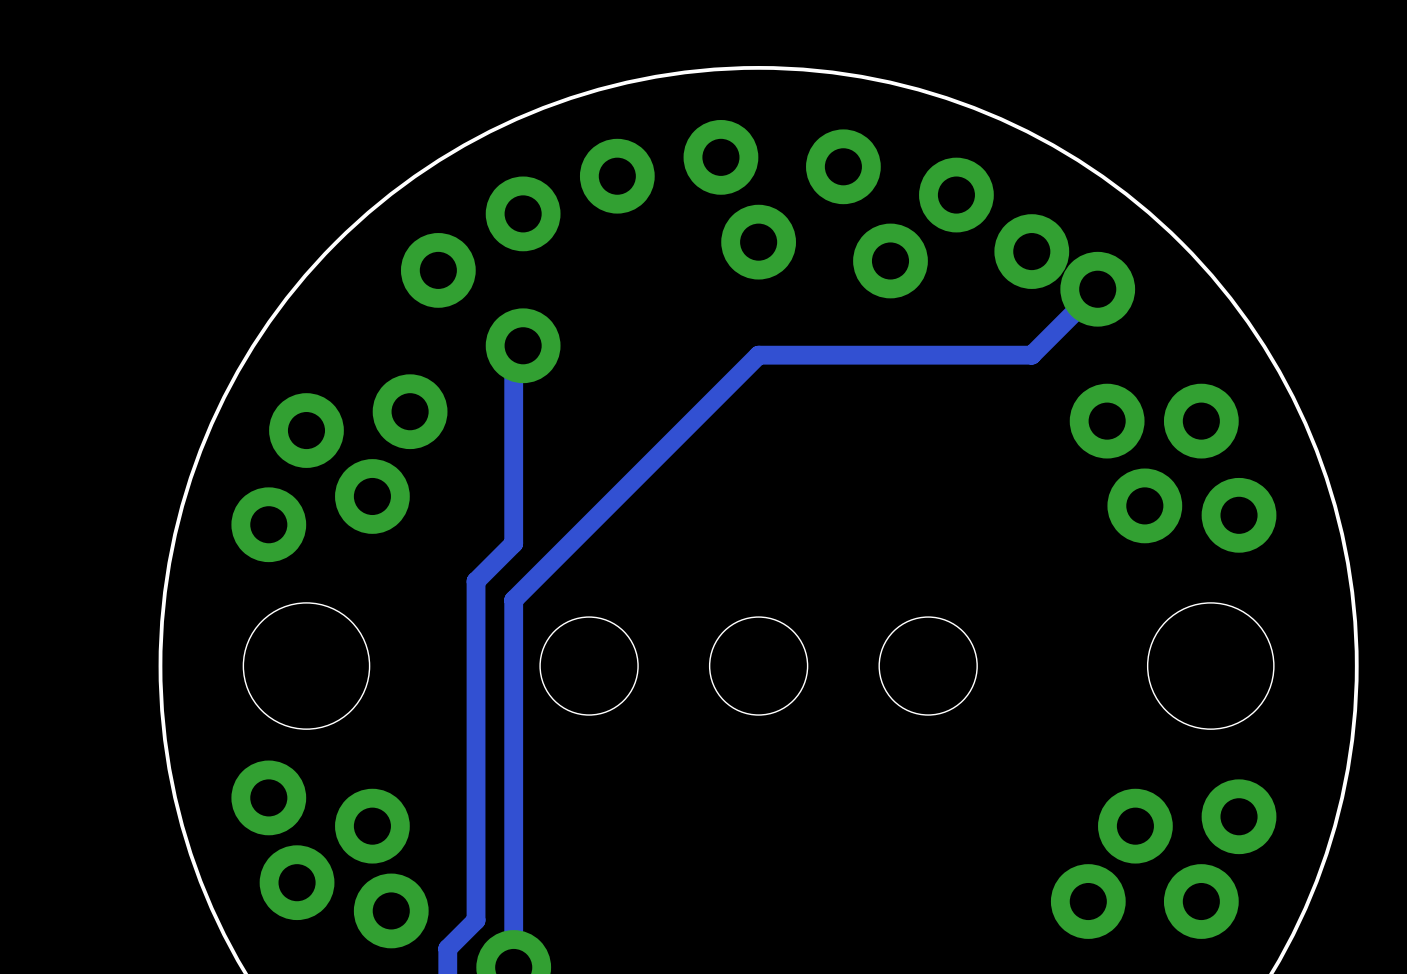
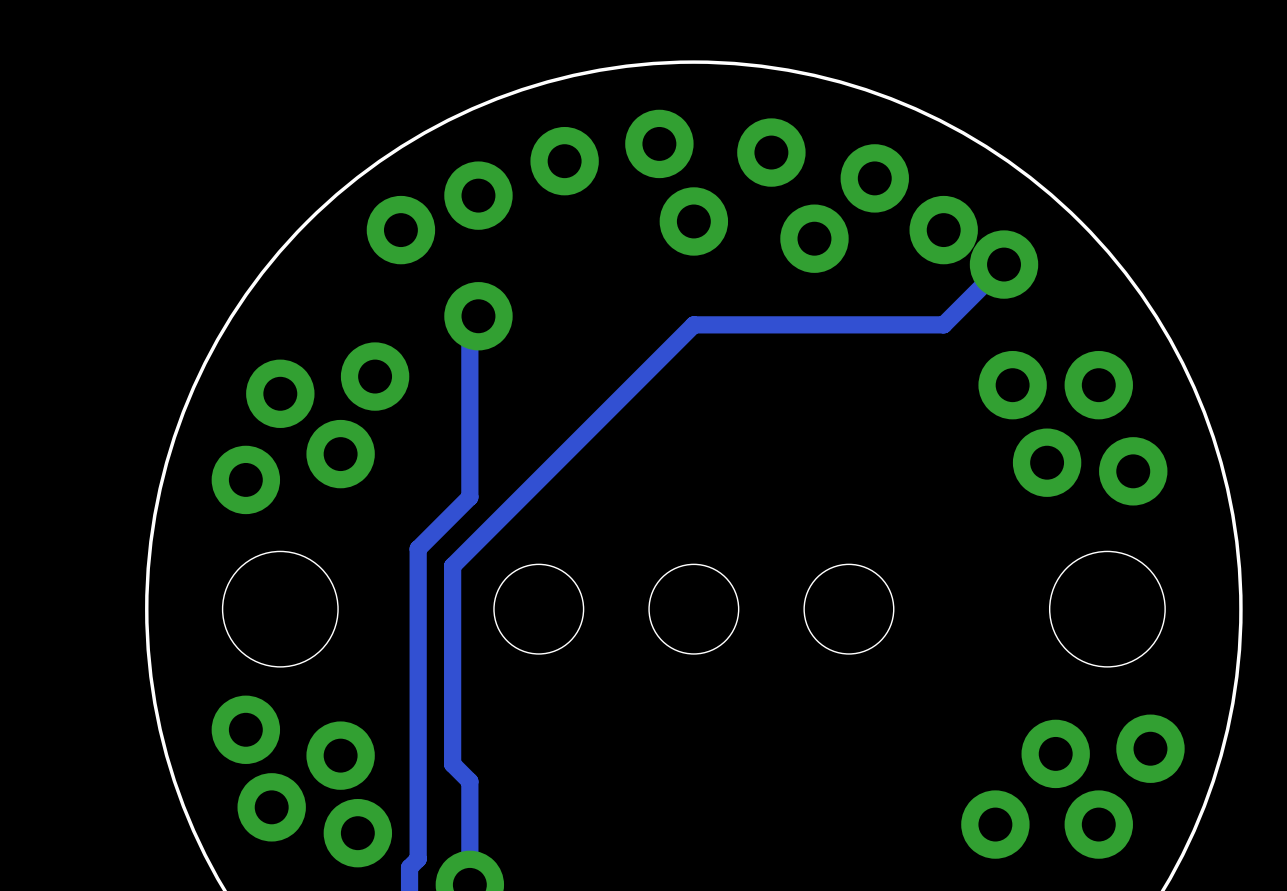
part position: (438, 270) -> (400, 230)
track: (476, 581) (476, 920) (457, 939) -> (435, 531) (418, 548) (418, 859)
track: (513, 600) (513, 854) -> (469, 548) (452, 566) (452, 764) (469, 781)
part position: (1239, 816) -> (1150, 748)
part position: (1135, 826) -> (1055, 753)

